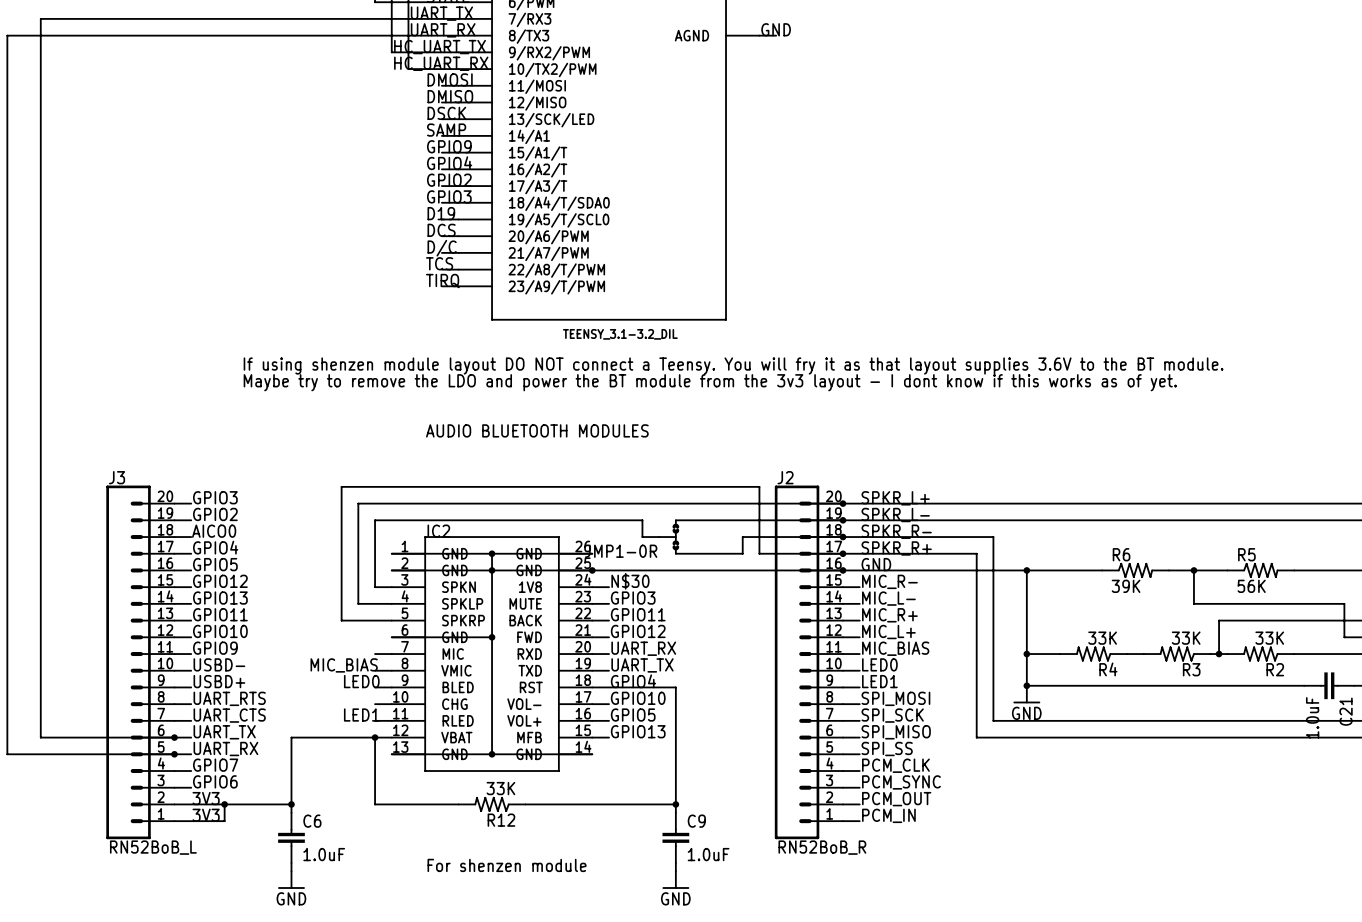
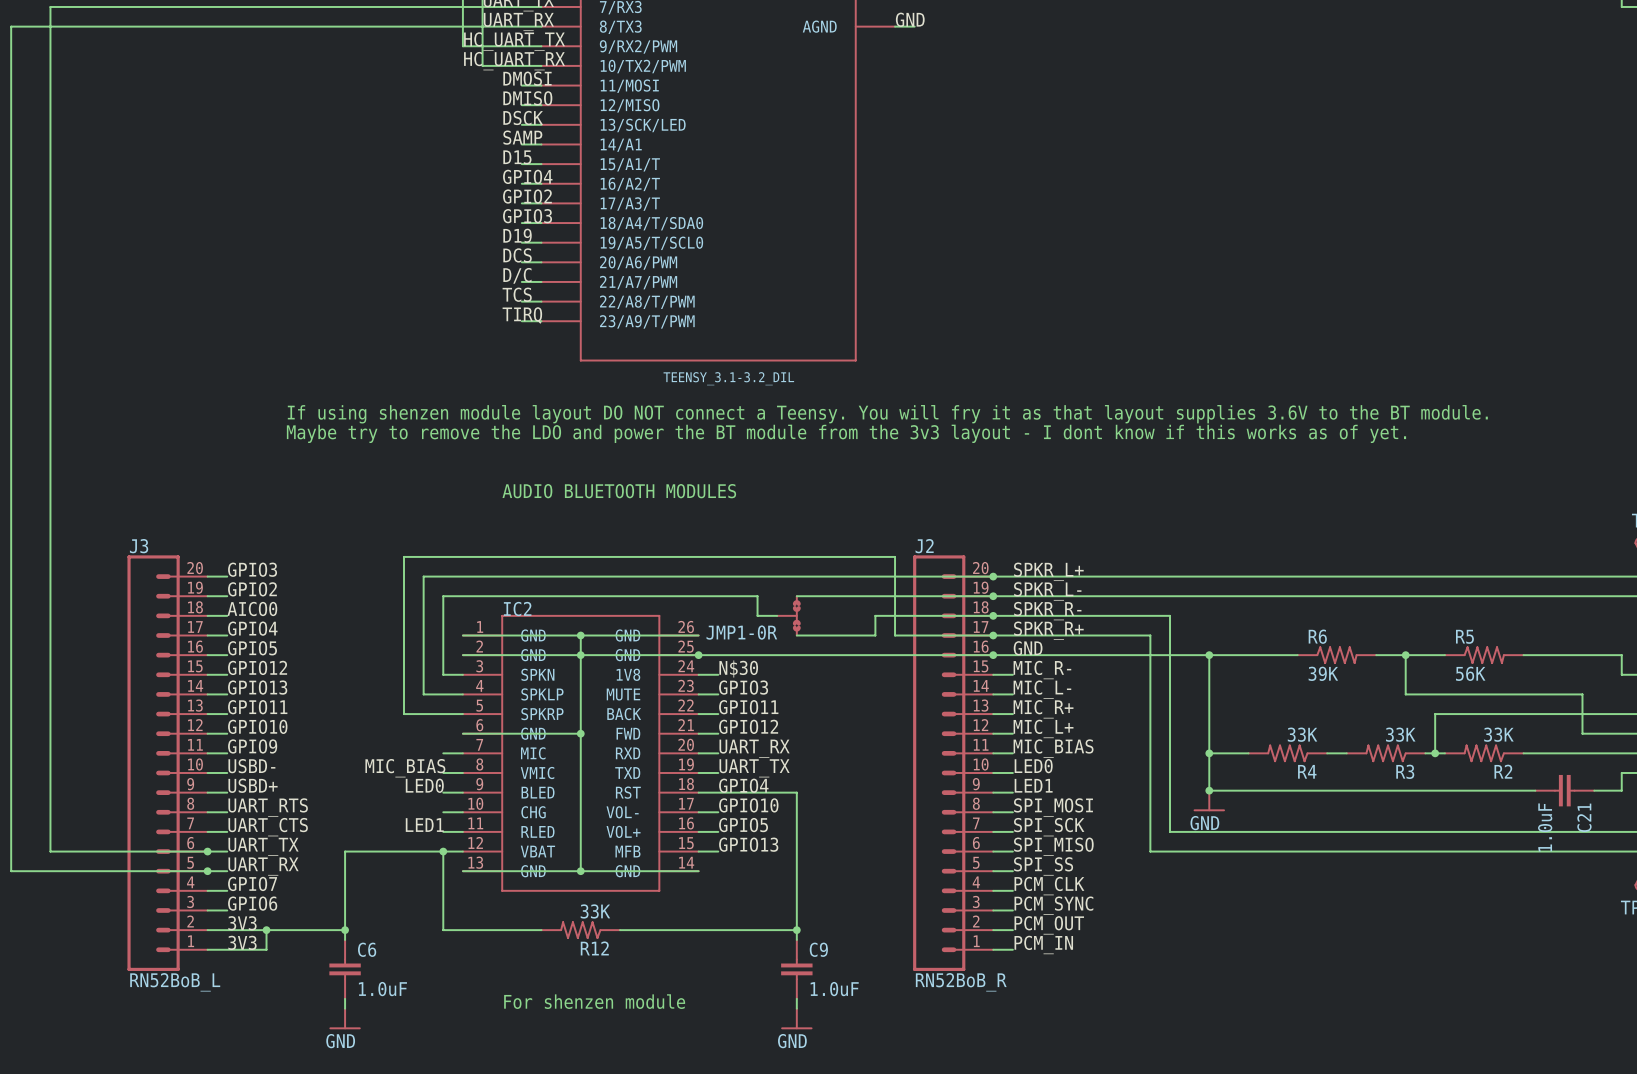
label: GPIO9 (449, 146) -> D15 (517, 157)

